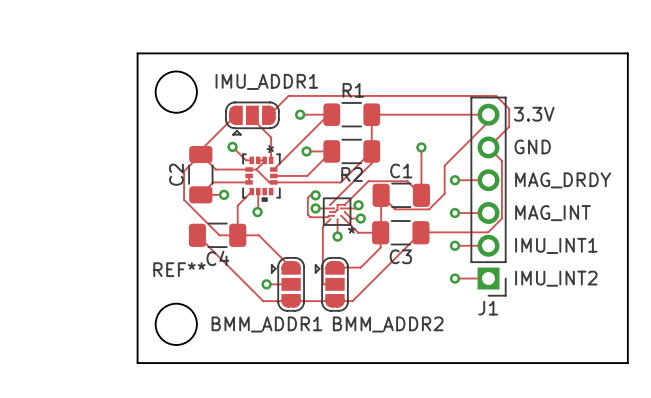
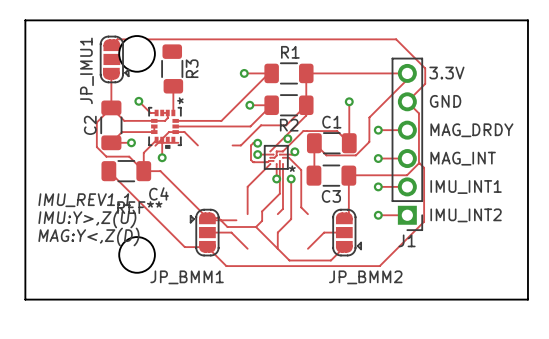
board edge: (137, 53) (137, 363) (627, 363) -> (103, 20) (25, 20) (25, 299) (527, 299) (527, 288)
track: (496, 95) (288, 95) (269, 115) -> (414, 57) (396, 39) (117, 39) (111, 44)
JP_IMU1: none -> (114, 59)
R3: none -> (172, 68)
track: none -> (111, 73) (111, 107)
track: (235, 115) (200, 150) (200, 154) -> none
track: (252, 115) (252, 118) (271, 137) (271, 160) -> none
IMU_ADDR1: (252, 118) -> none
track: none -> (173, 86) (173, 112)
via: none -> (138, 101)
track: (232, 146) (245, 160) (251, 160) -> (138, 101) (150, 112) (155, 112)
via: (232, 146) -> none
track: none -> (111, 107) (124, 120) (164, 120) (167, 118) (167, 112) (162, 112)
track: none -> (111, 107) (96, 122) (96, 147) (106, 156) (129, 156) (143, 171)
track: (200, 154) (184, 171) (184, 199) (219, 235) (258, 235) (291, 267) -> none
track: (200, 154) (215, 169) (220, 169) -> none
track: (258, 160) (264, 160) (256, 169) (269, 182) (340, 182) (348, 174) -> (232, 145) (240, 145) (261, 125) (286, 125)
track: none -> (206, 120) (221, 120)
C2 position: (200, 174) -> (111, 125)
track: none -> (154, 126) (154, 132) (122, 132) (111, 142) (131, 142)
track: none -> (175, 126) (221, 126)
track: (249, 175) (249, 182) (231, 182) -> (197, 145) (184, 132)
part: none -> (164, 127)
part: (261, 177) -> none
via: none -> (287, 138)
track: none -> (156, 139) (143, 152) (143, 171)
track: none -> (162, 139) (162, 157)
track: (251, 191) (237, 205) (237, 235) -> none
track: (258, 191) (257, 212) -> none
via: none -> (131, 142)
via position: (224, 194) -> (162, 157)
part footprint: [323, 197, 352, 226] -> [264, 145, 289, 170]
via: (257, 212) -> none
track: (344, 212) (351, 218) (360, 218) -> (283, 157) (288, 157) (301, 170) (301, 207) (307, 214)
track: (341, 215) (358, 232) (380, 232) (380, 247) (360, 267) (334, 267) -> (279, 160) (279, 193) (262, 211) (262, 220) (256, 227)
via: (360, 218) -> none
track: none -> (418, 163) (424, 167) (424, 221) (379, 266) (226, 266) (207, 247) (184, 247) (108, 171)
track: none -> (283, 164) (283, 208) (277, 214)
track: (322, 226) (322, 283) (334, 284) -> (263, 170) (247, 186) (247, 214)
track: none -> (143, 171) (160, 171) (207, 218) (218, 218) (227, 227) (256, 227)
track: (420, 232) (352, 301) (263, 301) (197, 235) -> (348, 175) (348, 213) (344, 218)
C4 position: (217, 235) -> (126, 171)
track: none -> (291, 178) (291, 219) (277, 232) (277, 248)
via: none -> (291, 178)
C4 name position: C4 (217, 258) -> C4 (158, 193)
text: none -> IMU_REV1.1 (84, 200)
text: none -> IMU:Y>,Z(U) (87, 218)
via: (266, 284) -> none
BMM_ADDR1: (287, 284) -> none
BMM_ADDR2: (331, 284) -> none
track: none -> (256, 227) (289, 260) (330, 260) (344, 247)
JP_BMM1: none -> (204, 232)
track: none -> (207, 232) (231, 232) (247, 248)
track: none -> (344, 232) (324, 232) (307, 248)
JP_BMM2: none -> (347, 232)
text: none -> MAG:Y<,Z(D) (88, 236)

